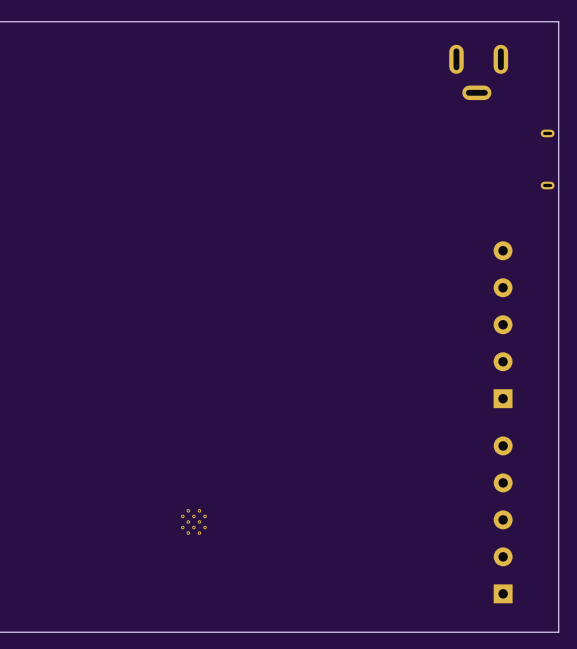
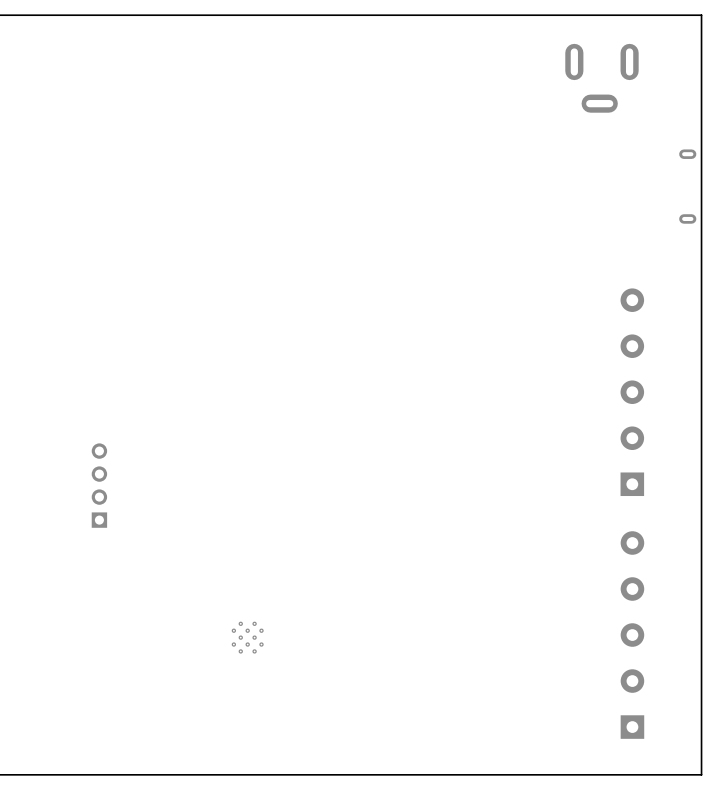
part: none -> (99, 485)

